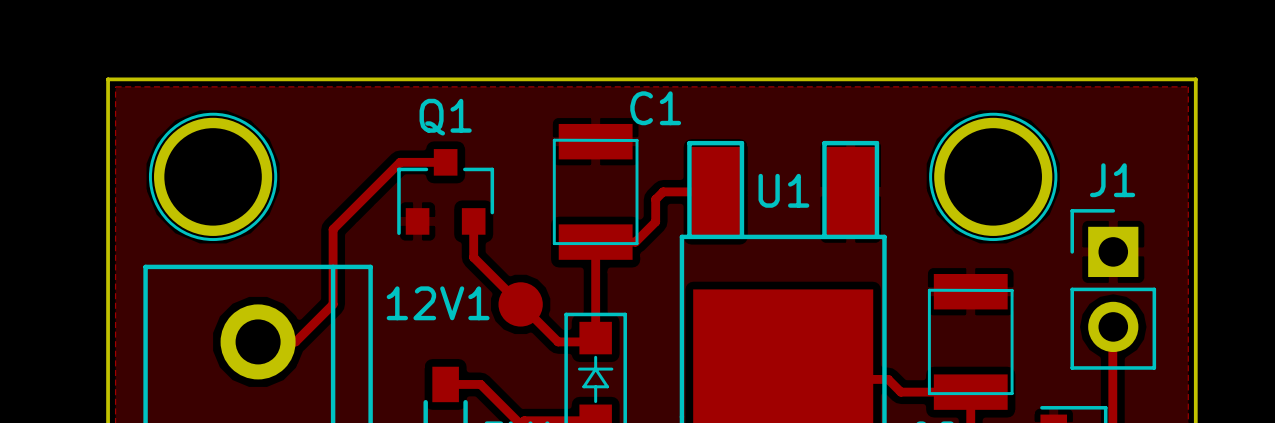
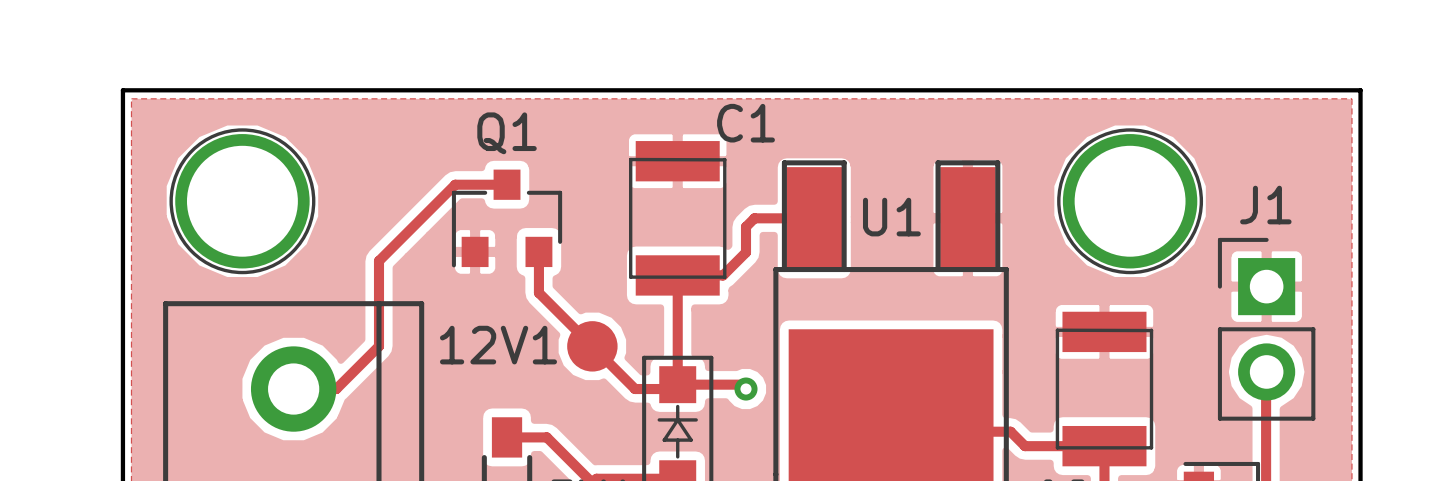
track: none -> (677, 384) (741, 384) (746, 389)
via: none -> (746, 389)

